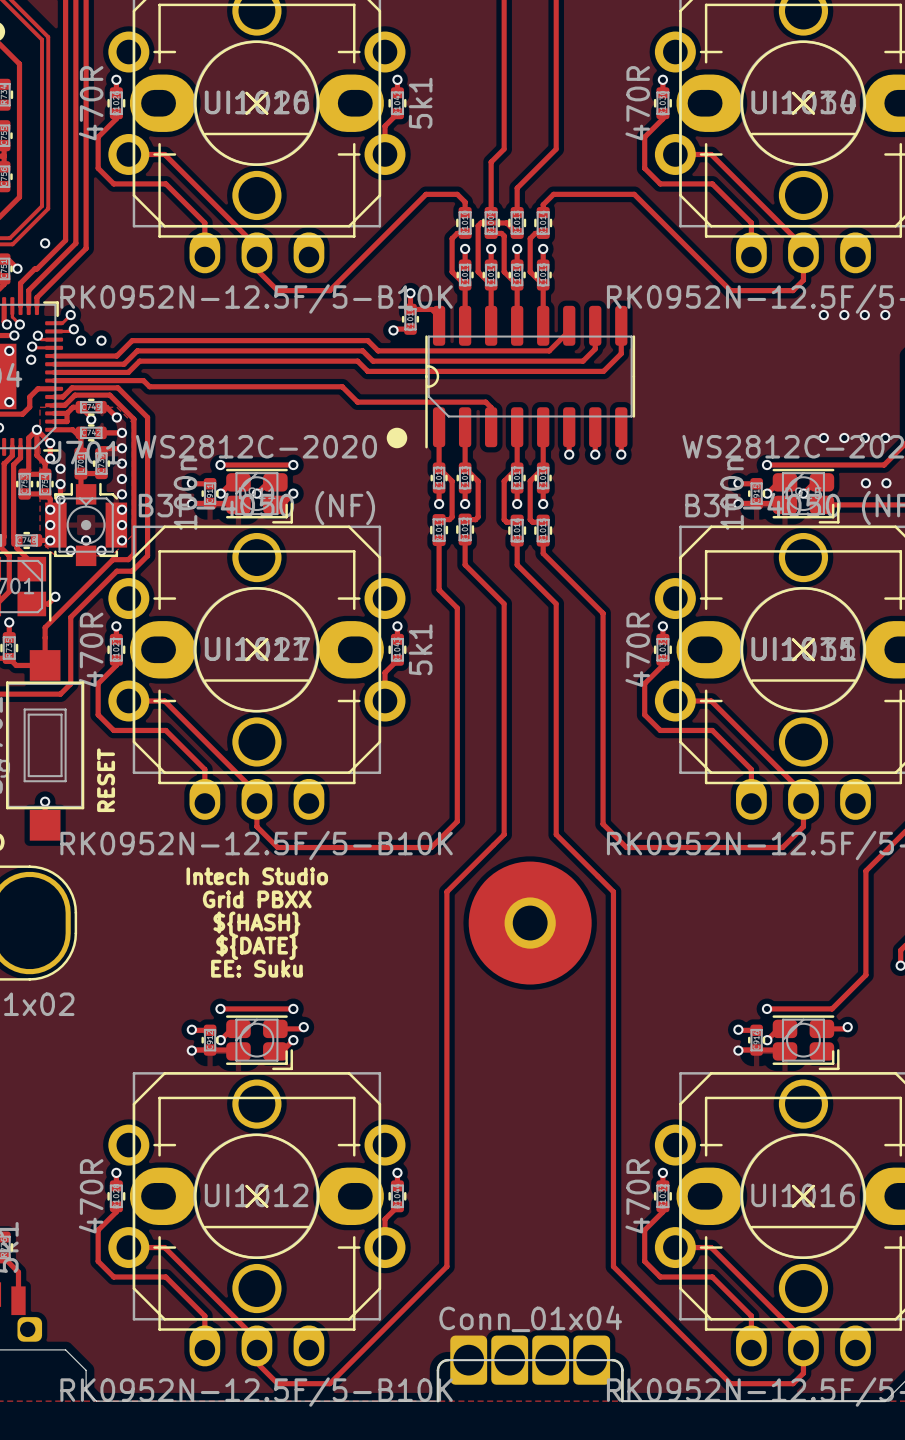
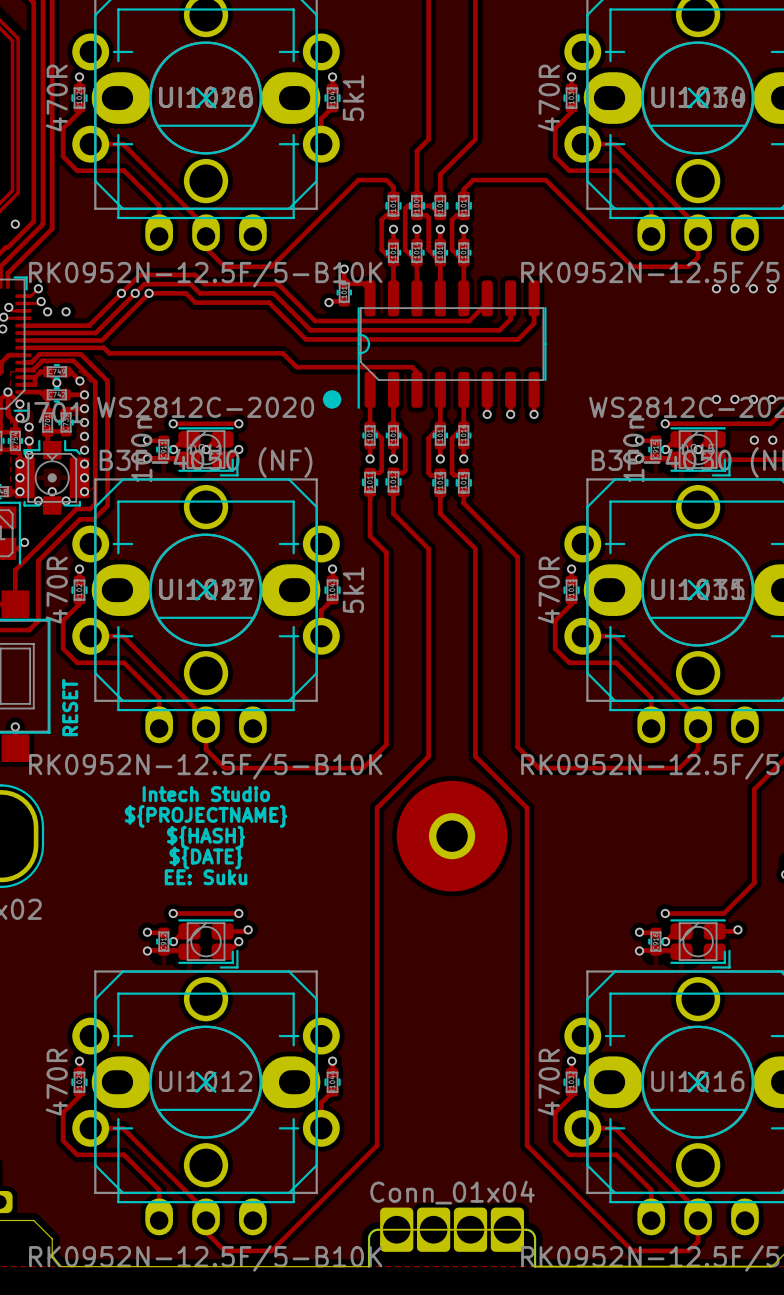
via: none -> (121, 293)
via: none -> (135, 293)
via: none -> (149, 293)
track: (367, 340) (132, 340) (116, 356) -> (305, 311) (278, 284) (204, 284) (195, 274) (139, 274) (89, 325) (79, 325)
track: (362, 350) (137, 350) (124, 364) -> (301, 321) (273, 293) (199, 293) (190, 284) (144, 284) (95, 333) (86, 333)
track: (357, 361) (139, 361) (128, 372) -> (296, 330) (269, 302) (195, 302) (186, 293) (149, 293) (102, 340) (90, 340)
text: Grid PBXX (257, 899) -> ${PROJECTNAME} (206, 816)

